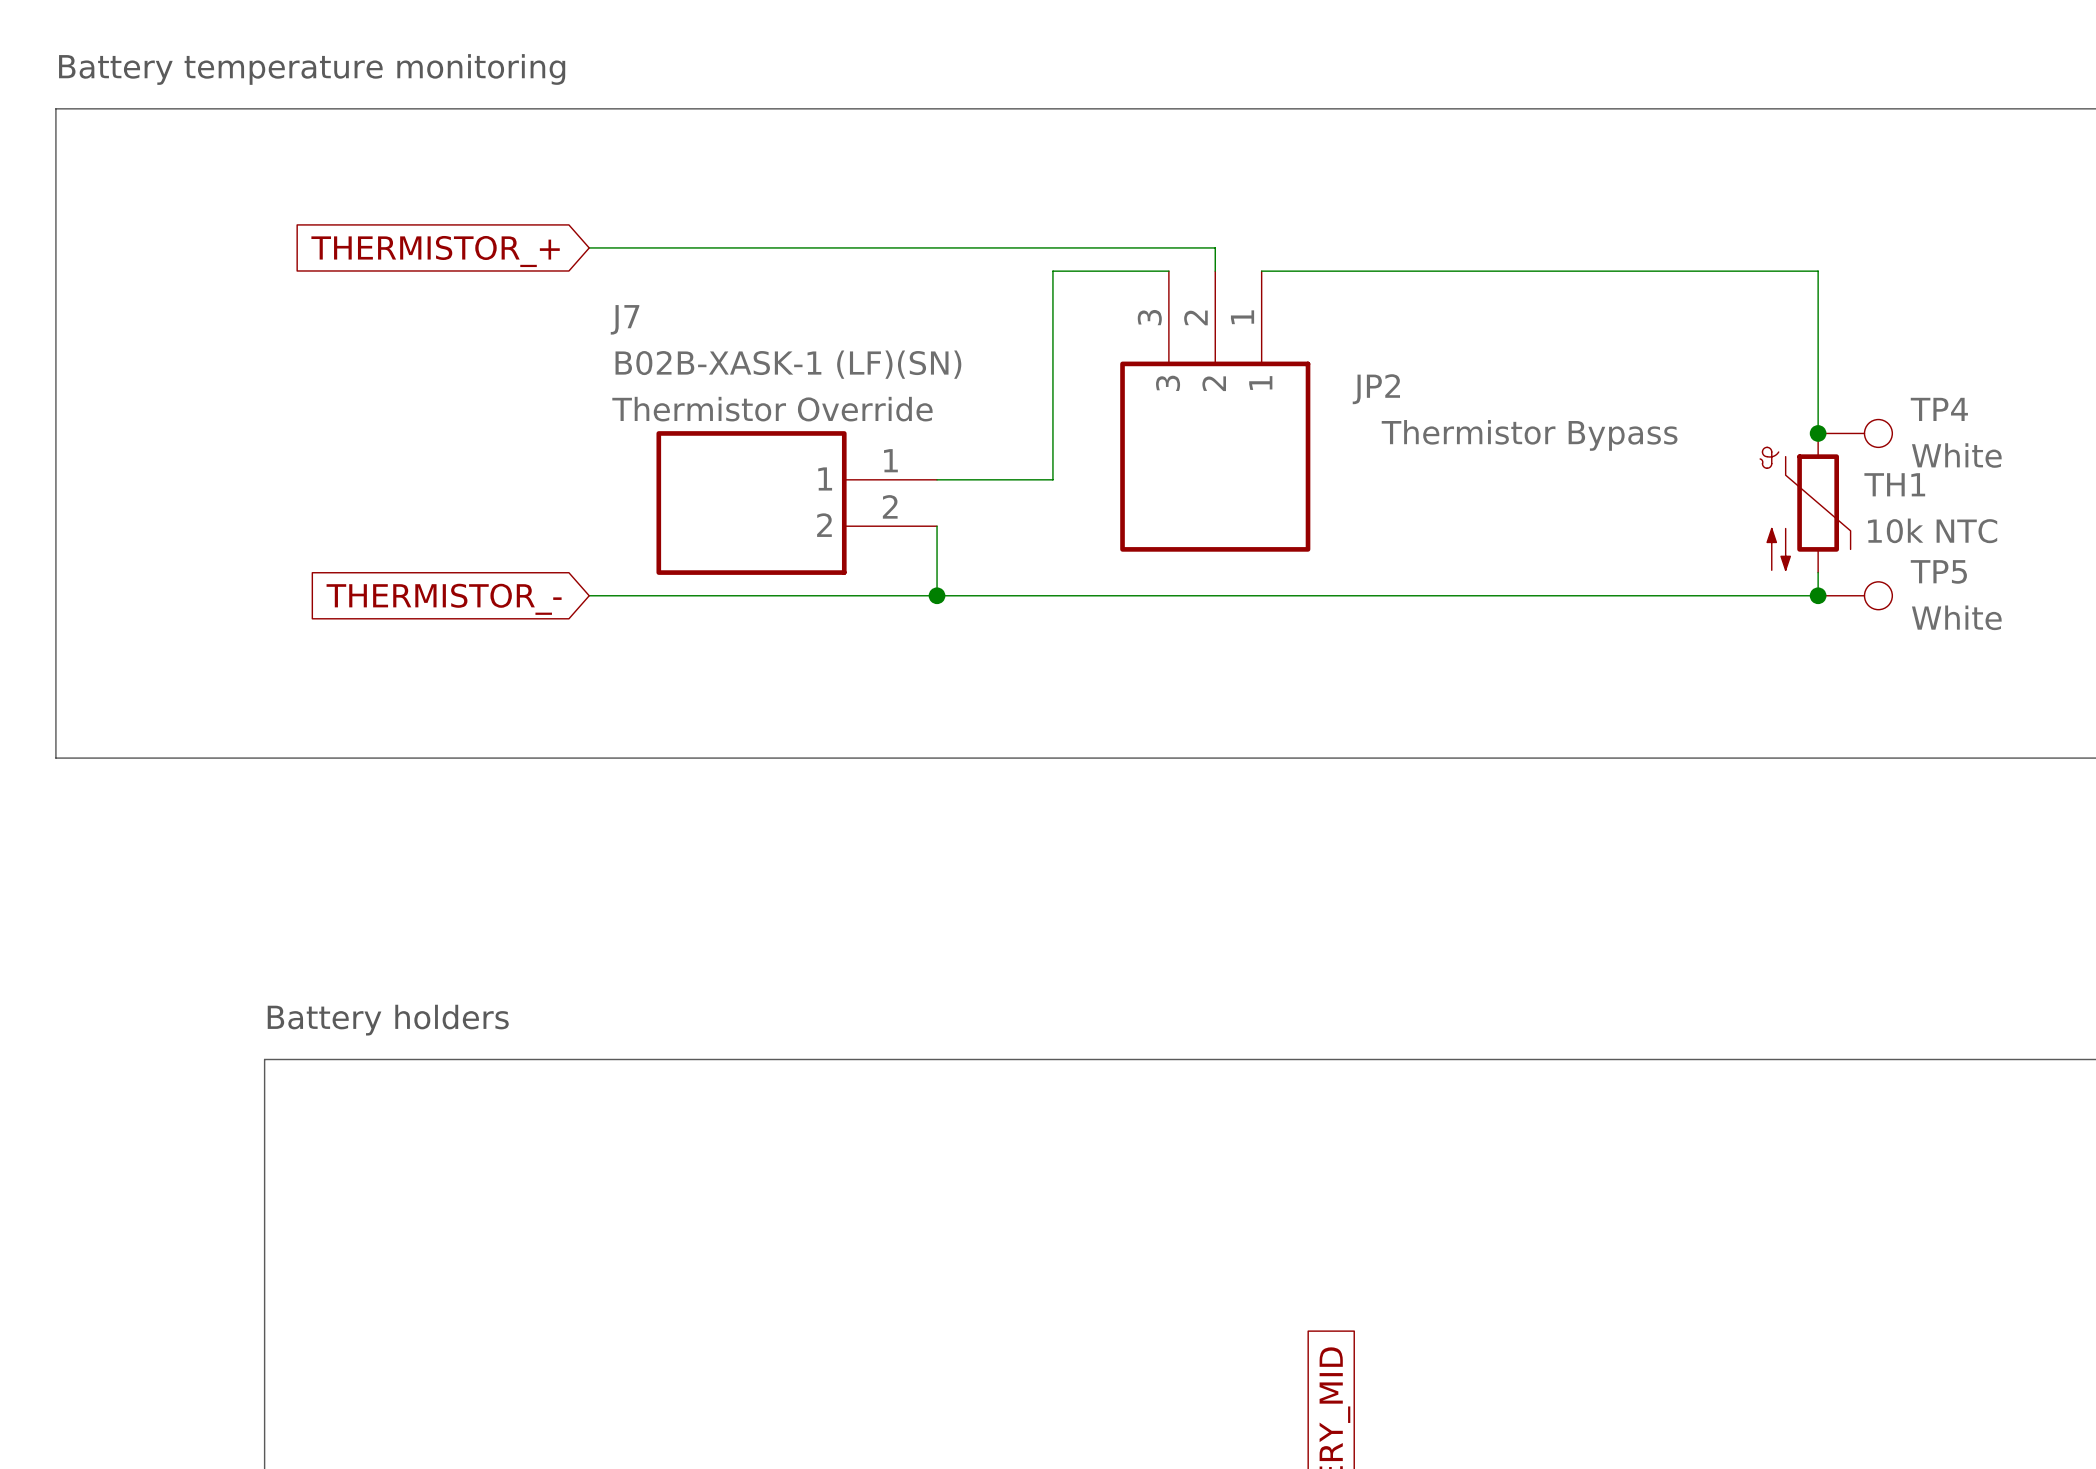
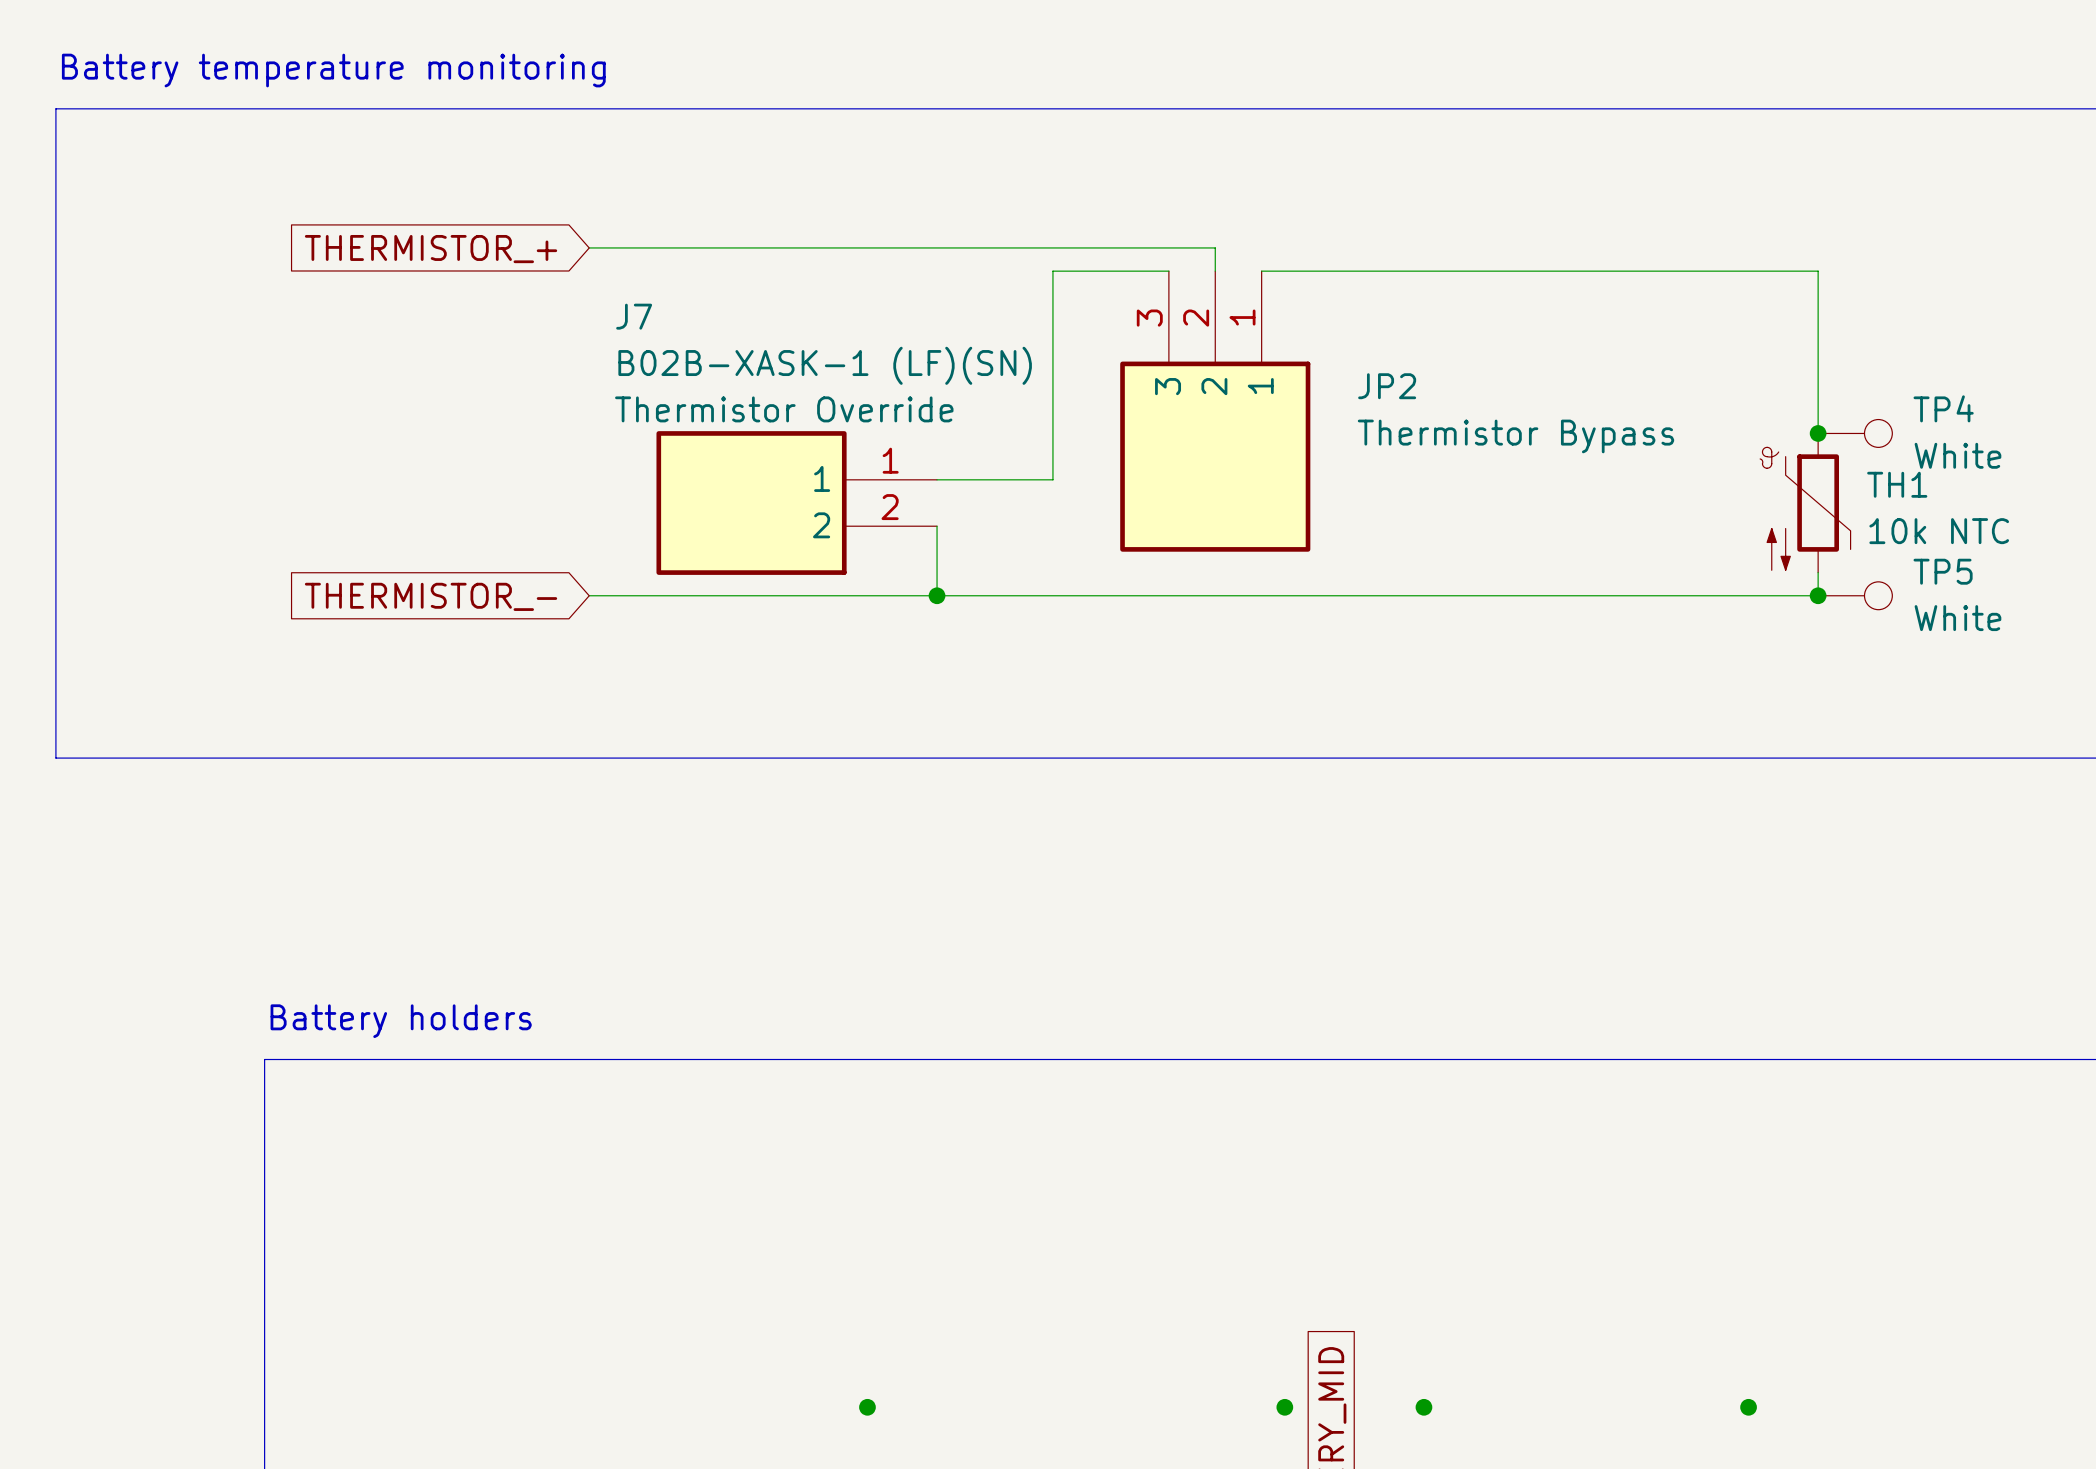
junction: none -> (867, 1407)
junction: none -> (1284, 1407)
junction: none -> (1423, 1407)
junction: none -> (1748, 1407)

